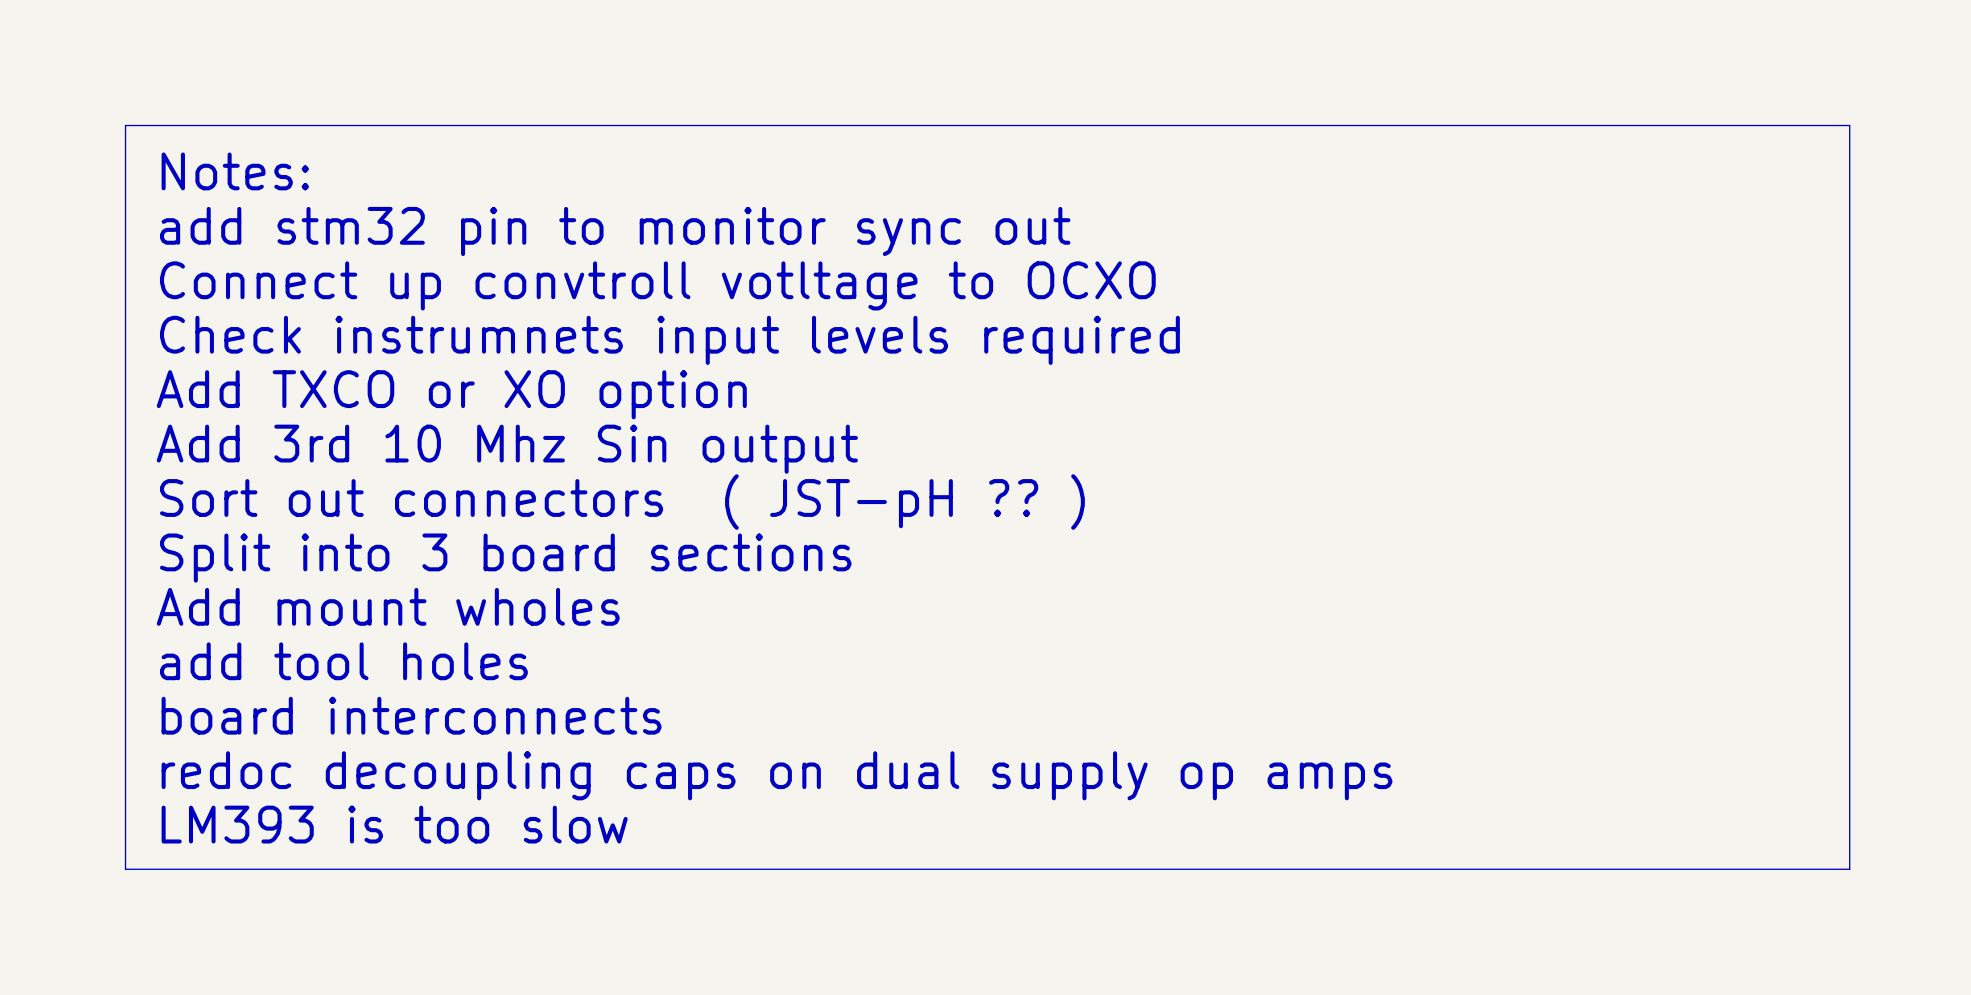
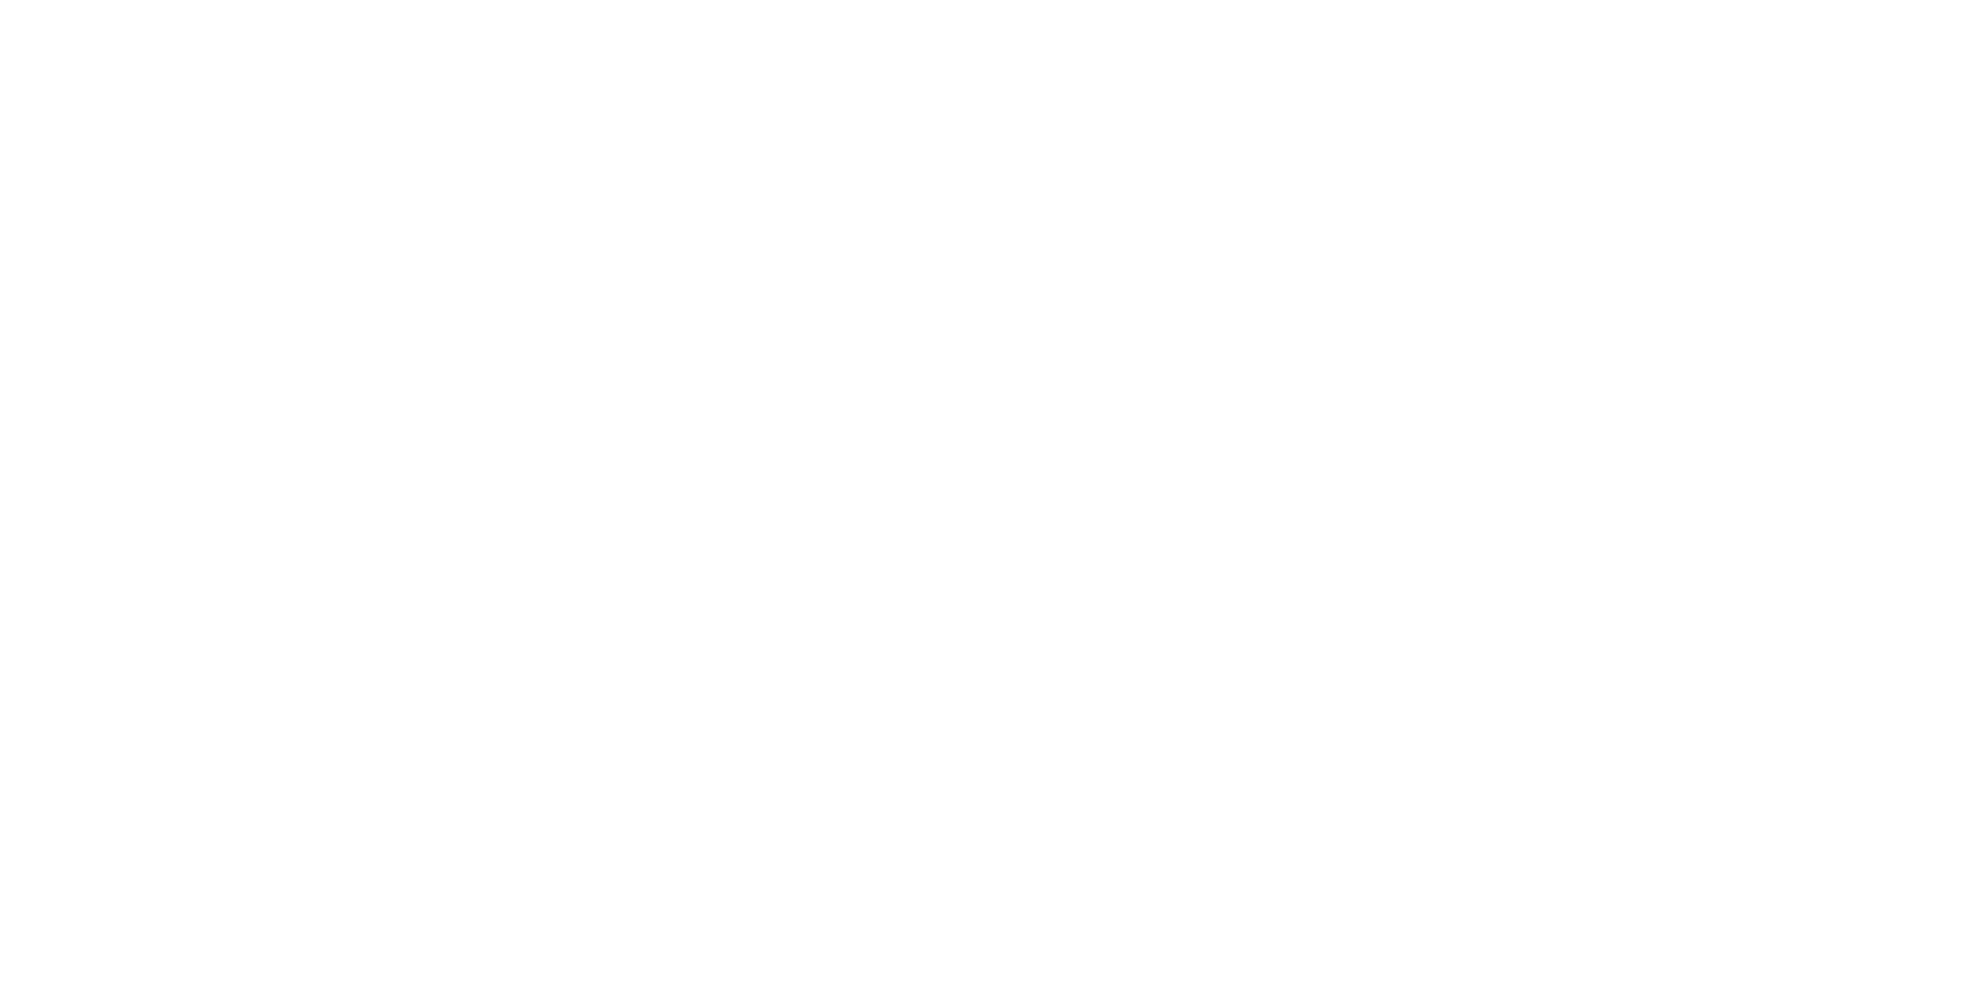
line: (125, 125) (1849, 125) (1849, 869) (125, 869) (125, 125) -> none
text: Notes: (235, 171) -> none
text: add stm32 pin to monitor sync out (615, 231) -> none
text: Connect up convtroll votltage to OCXO (657, 285) -> none
text: Check instrumnets input levels required (669, 340) -> none
text: Add TXCO or XO option (451, 394) -> none
text: Add 3rd 10 Mhz Sin output (507, 449) -> none
text: Sort out connectors ( JST-pH ?? ) (622, 502) -> none
text: Split into 3 board sections (505, 558) -> none
text: Add mount wholes (388, 606) -> none
text: add tool holes (343, 661) -> none
text: board interconnects (411, 715) -> none
text: redoc decoupling caps on dual supply op amps (776, 775) -> none
text: LM393 is too slow (394, 824) -> none

